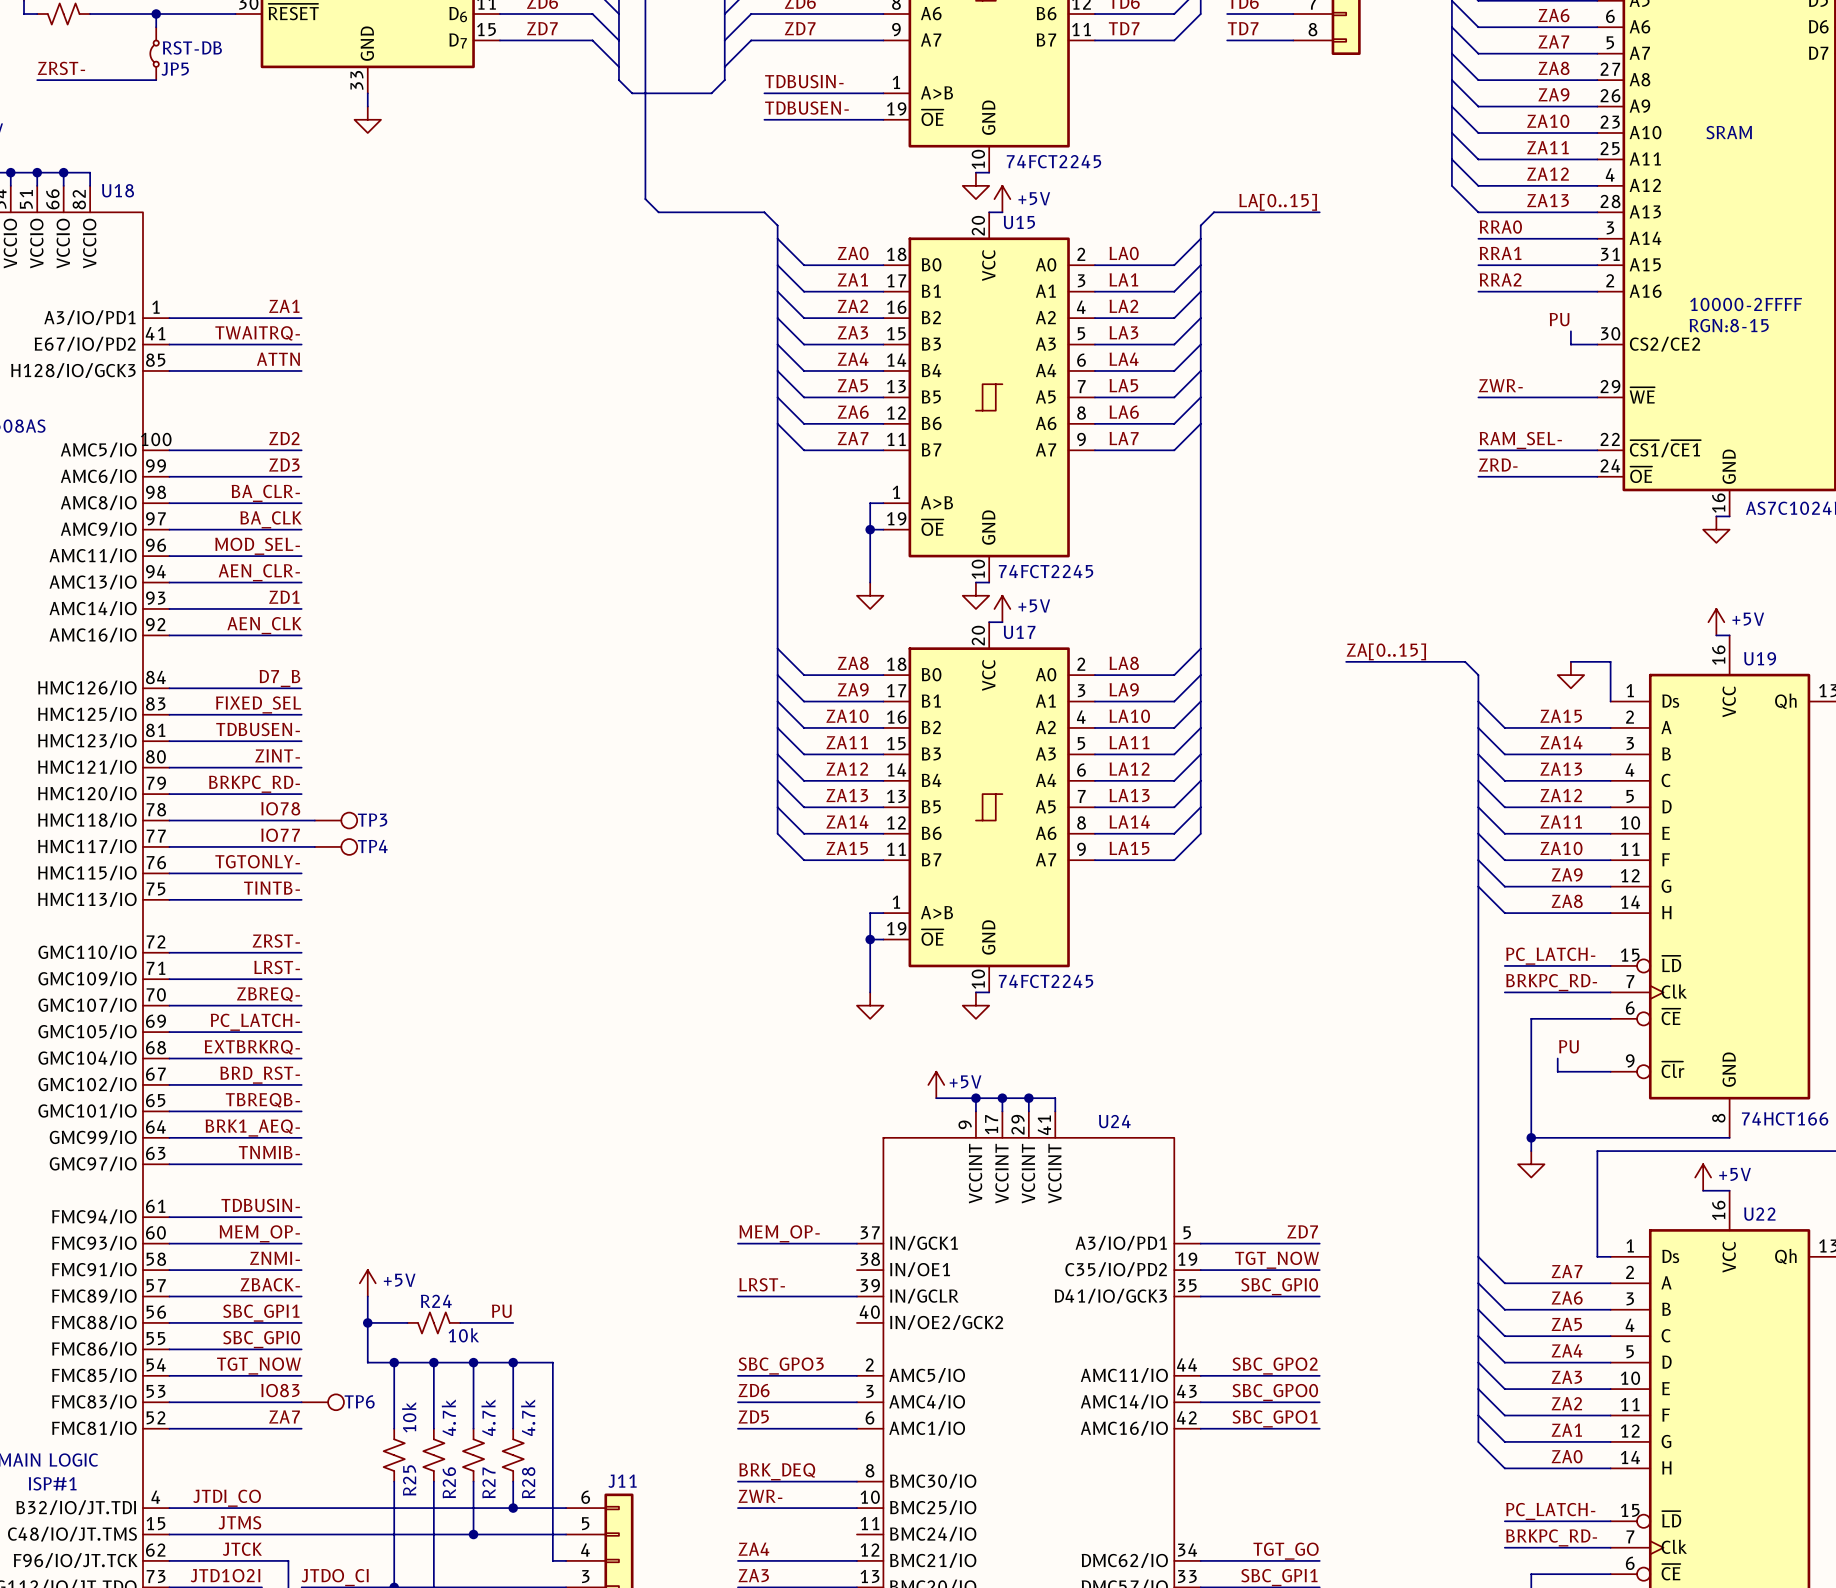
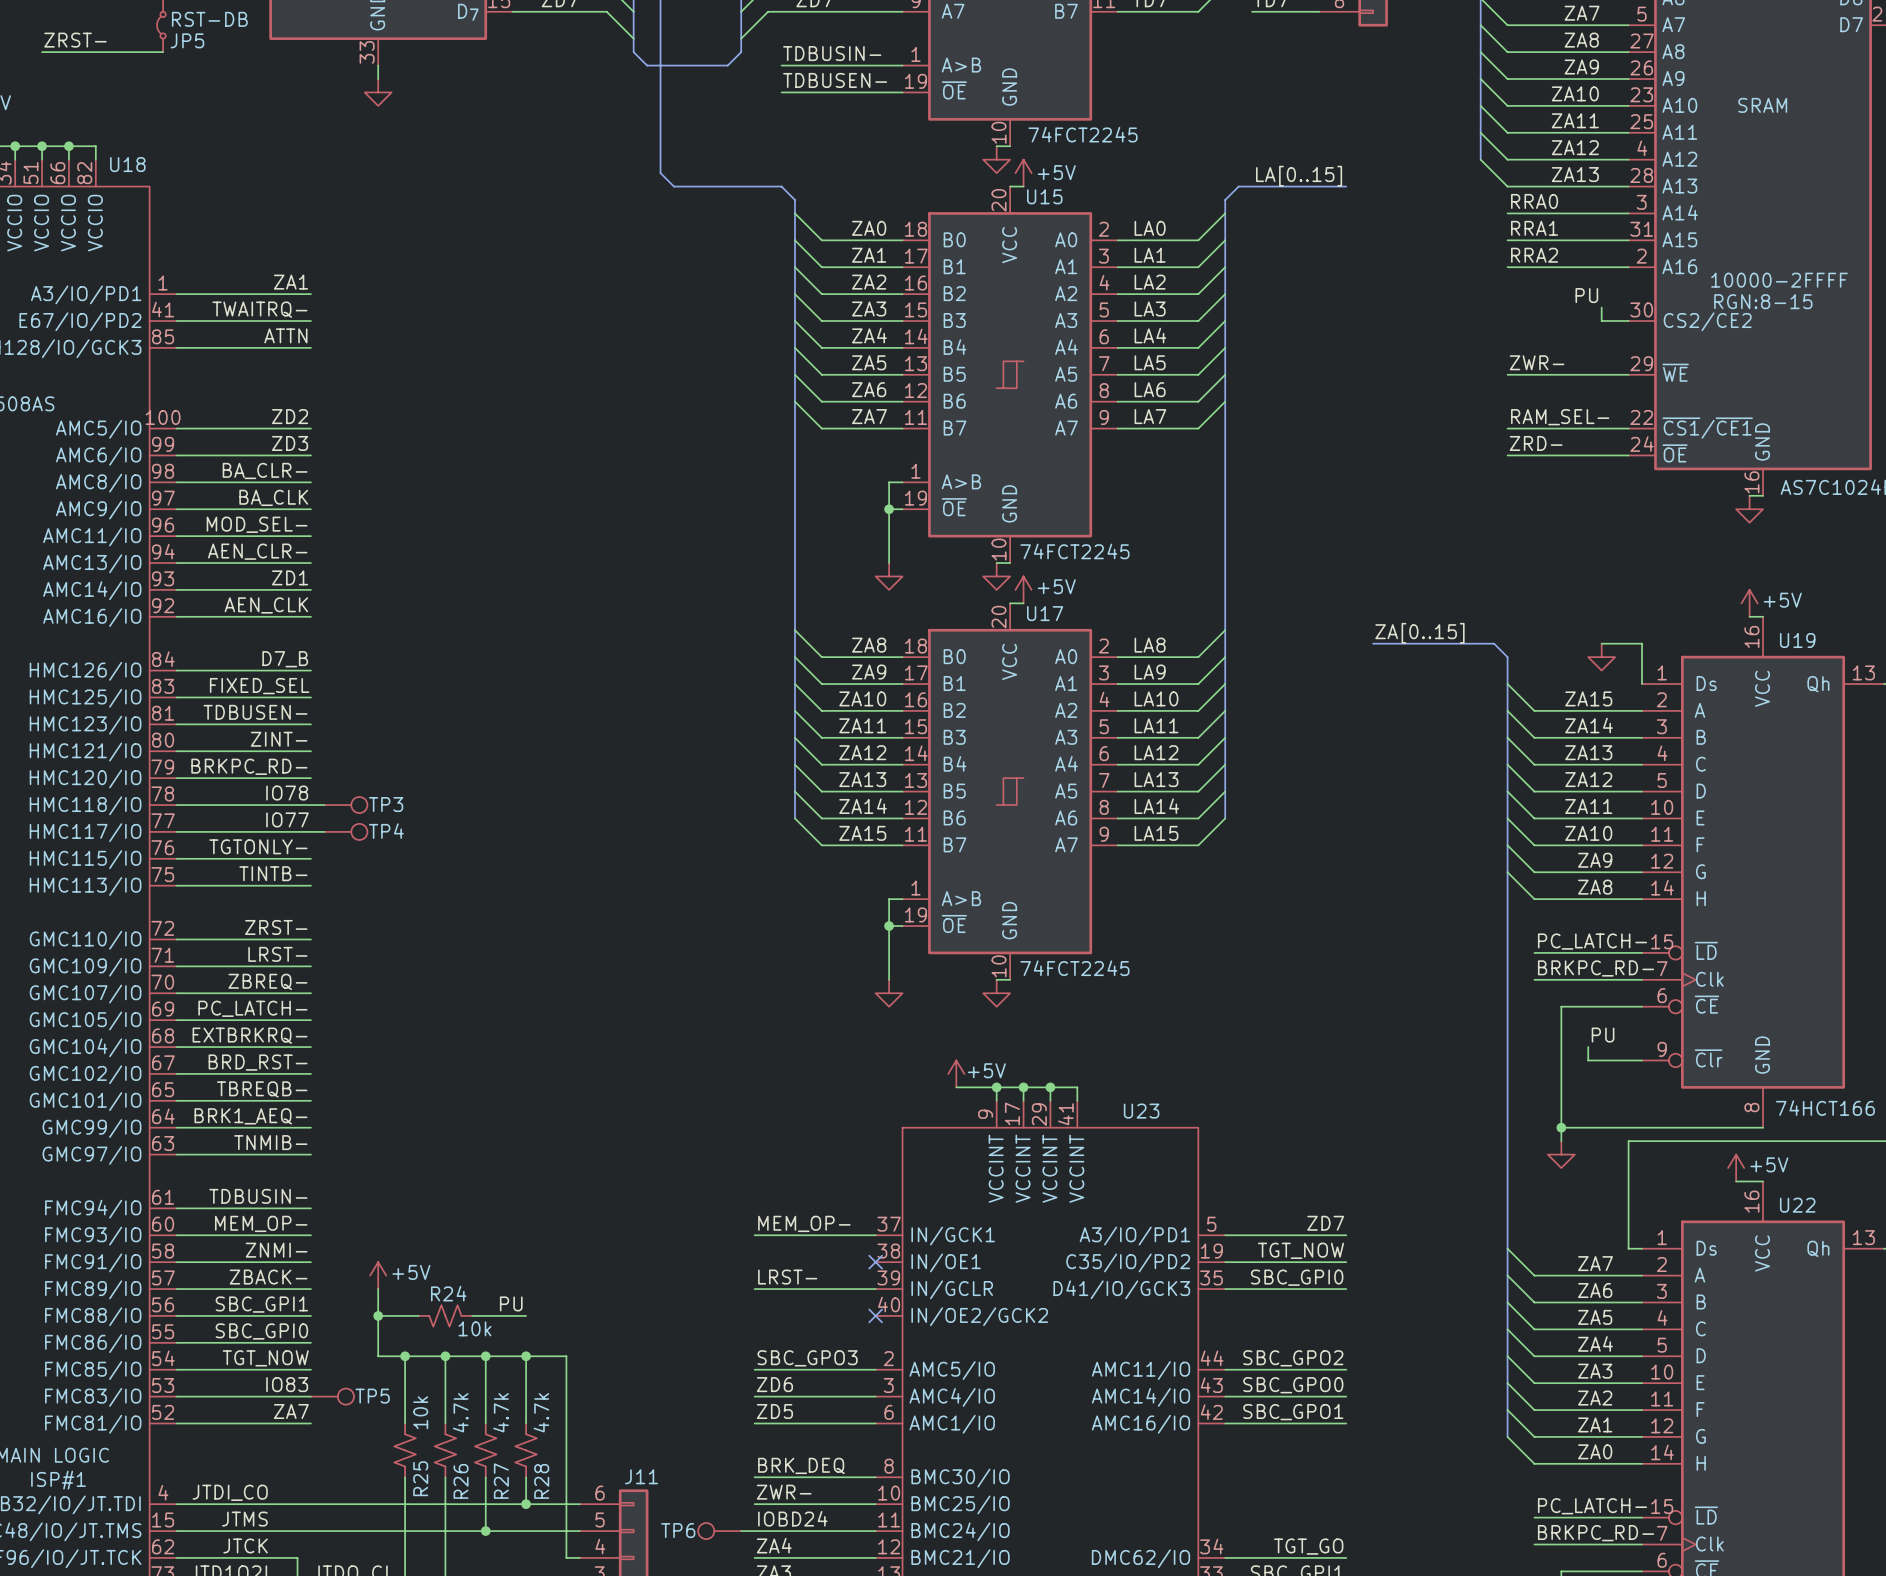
U24 name: U24 (1114, 1121) -> U23 (1141, 1111)
no-connect mark: none -> (875, 1262)
no-connect mark: none -> (875, 1315)
TP6 name: TP6 (359, 1401) -> TP5 (372, 1396)
label: none -> IOBD24 (792, 1518)
TP6: none -> (719, 1531)
wire: none -> (741, 1531) (875, 1531)

